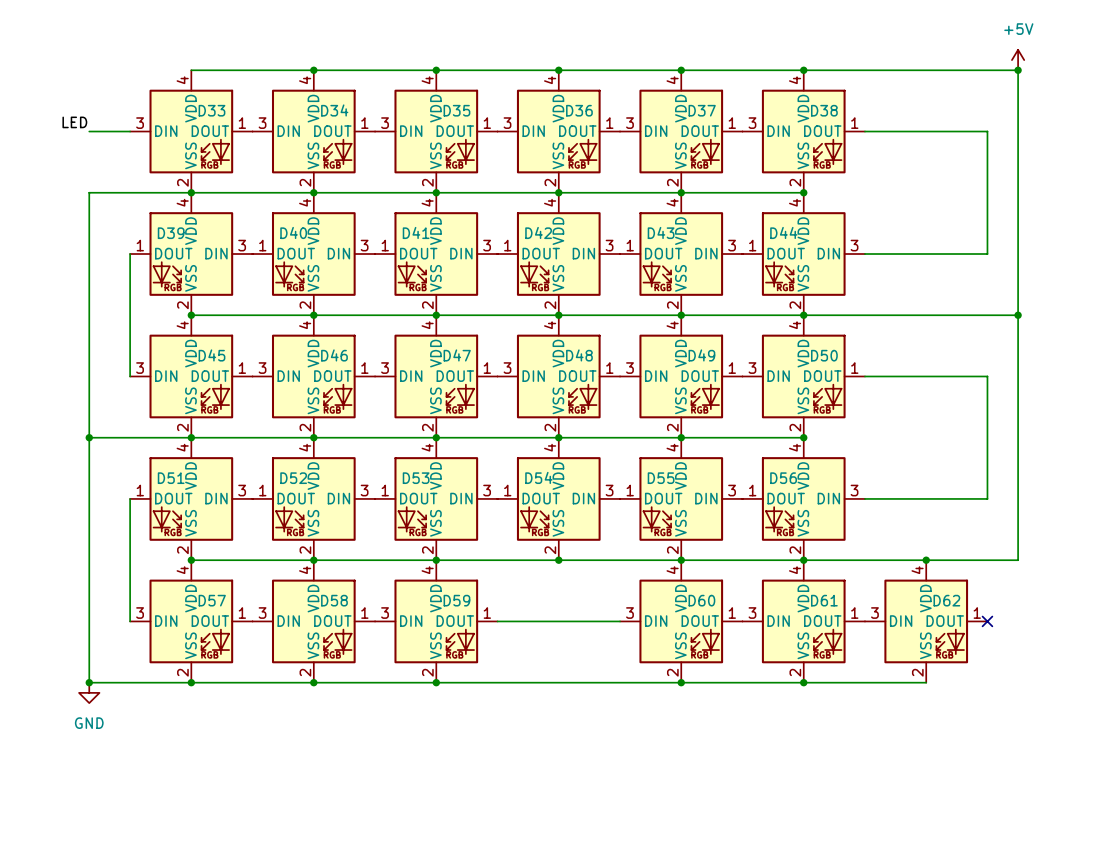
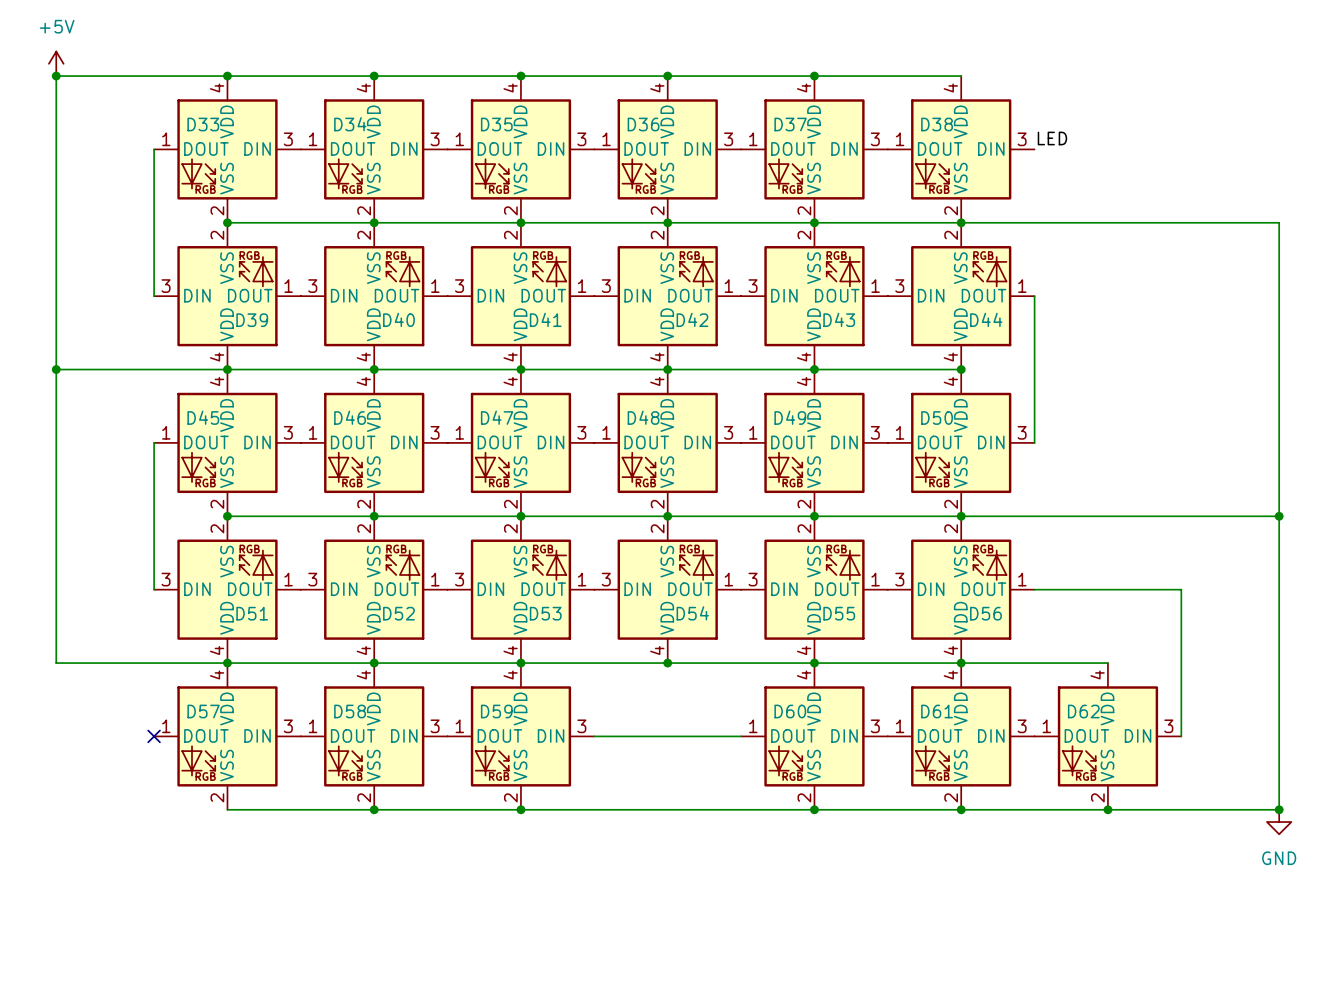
power symbol: none -> +5V (56, 63)
power symbol: +5V (1018, 60) -> none
junction: none -> (56, 76)
wire: none -> (227, 76) (56, 76) (56, 663) (227, 663)
junction: none -> (227, 76)
wire: (803, 70) (1018, 70) (1018, 560) (926, 560) -> none
junction: (803, 70) -> none
junction: (1018, 70) -> none
label: LED (74, 122) -> none
label: none -> LED (1052, 138)
wire: (89, 131) (130, 131) -> (154, 296) (154, 149)
D33 flip: as is (191, 131) -> left-right (227, 149)
D34 flip: as is (313, 131) -> left-right (374, 149)
D35 flip: as is (436, 131) -> left-right (520, 149)
D36 flip: as is (558, 131) -> left-right (667, 149)
D37 flip: as is (681, 131) -> left-right (814, 149)
D38 flip: as is (803, 131) -> left-right (961, 149)
wire: (864, 131) (987, 131) (987, 254) (864, 254) -> (1034, 442) (1034, 296)
wire: (191, 192) (89, 192) (89, 682) (191, 682) -> none
wire: none -> (961, 222) (1279, 222) (1279, 809) (1107, 809)
wire: (130, 254) (130, 376) -> none
D39 rotation: 0° (191, 254) -> 180° (227, 296)
D40 rotation: 0° (313, 254) -> 180° (374, 296)
D41 rotation: 0° (436, 254) -> 180° (520, 296)
D42 rotation: 0° (558, 254) -> 180° (667, 296)
D43 rotation: 0° (681, 254) -> 180° (814, 296)
D44 rotation: 0° (803, 254) -> 180° (961, 296)
wire: none -> (56, 369) (227, 369)
junction: none -> (56, 369)
wire: (803, 315) (1018, 315) -> none
junction: (1018, 315) -> none
D45 flip: as is (191, 376) -> left-right (227, 442)
D46 flip: as is (313, 376) -> left-right (374, 442)
D47 flip: as is (436, 376) -> left-right (520, 442)
D48 flip: as is (558, 376) -> left-right (667, 442)
D49 flip: as is (681, 376) -> left-right (814, 442)
D50 flip: as is (803, 376) -> left-right (961, 442)
wire: (864, 376) (987, 376) (987, 498) -> (1181, 736) (1181, 589)
wire: (89, 437) (191, 437) -> none
junction: (89, 437) -> none
wire: none -> (961, 516) (1279, 516)
junction: none -> (1279, 516)
wire: (130, 498) (130, 621) -> (154, 589) (154, 442)
D51 rotation: 0° (191, 498) -> 180° (227, 589)
D52 rotation: 0° (313, 498) -> 180° (374, 589)
D53 rotation: 0° (436, 498) -> 180° (520, 589)
D54 rotation: 0° (558, 498) -> 180° (667, 589)
D55 rotation: 0° (681, 498) -> 180° (814, 589)
D56 rotation: 0° (803, 498) -> 180° (961, 589)
junction: (926, 560) -> none
no-connect mark: none -> (154, 736)
D57 flip: as is (191, 621) -> left-right (227, 736)
D58 flip: as is (313, 621) -> left-right (374, 736)
D59 flip: as is (436, 621) -> left-right (520, 736)
D60 flip: as is (681, 621) -> left-right (814, 736)
D61 flip: as is (803, 621) -> left-right (961, 736)
D62 flip: as is (926, 621) -> left-right (1107, 736)
no-connect mark: (987, 621) -> none
junction: (89, 682) -> none
junction: (191, 682) -> none
junction: none -> (1107, 809)
junction: none -> (1279, 809)
power symbol: GND (89, 692) -> none
power symbol: none -> GND (1279, 822)

